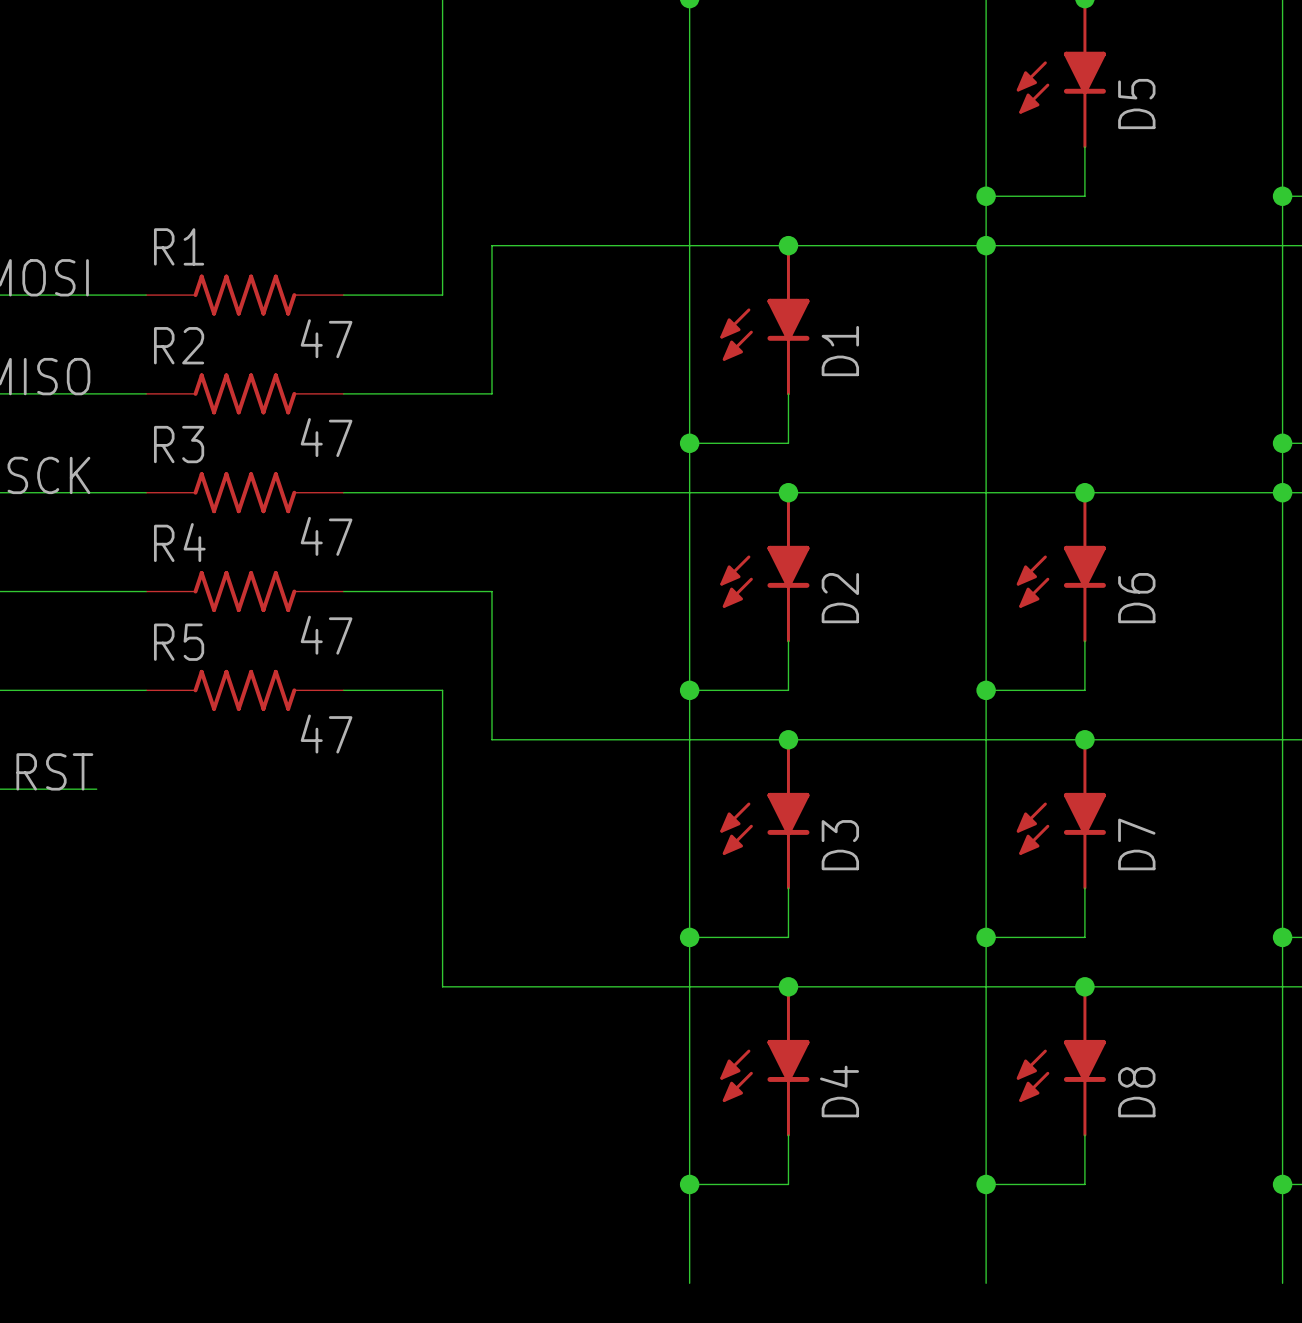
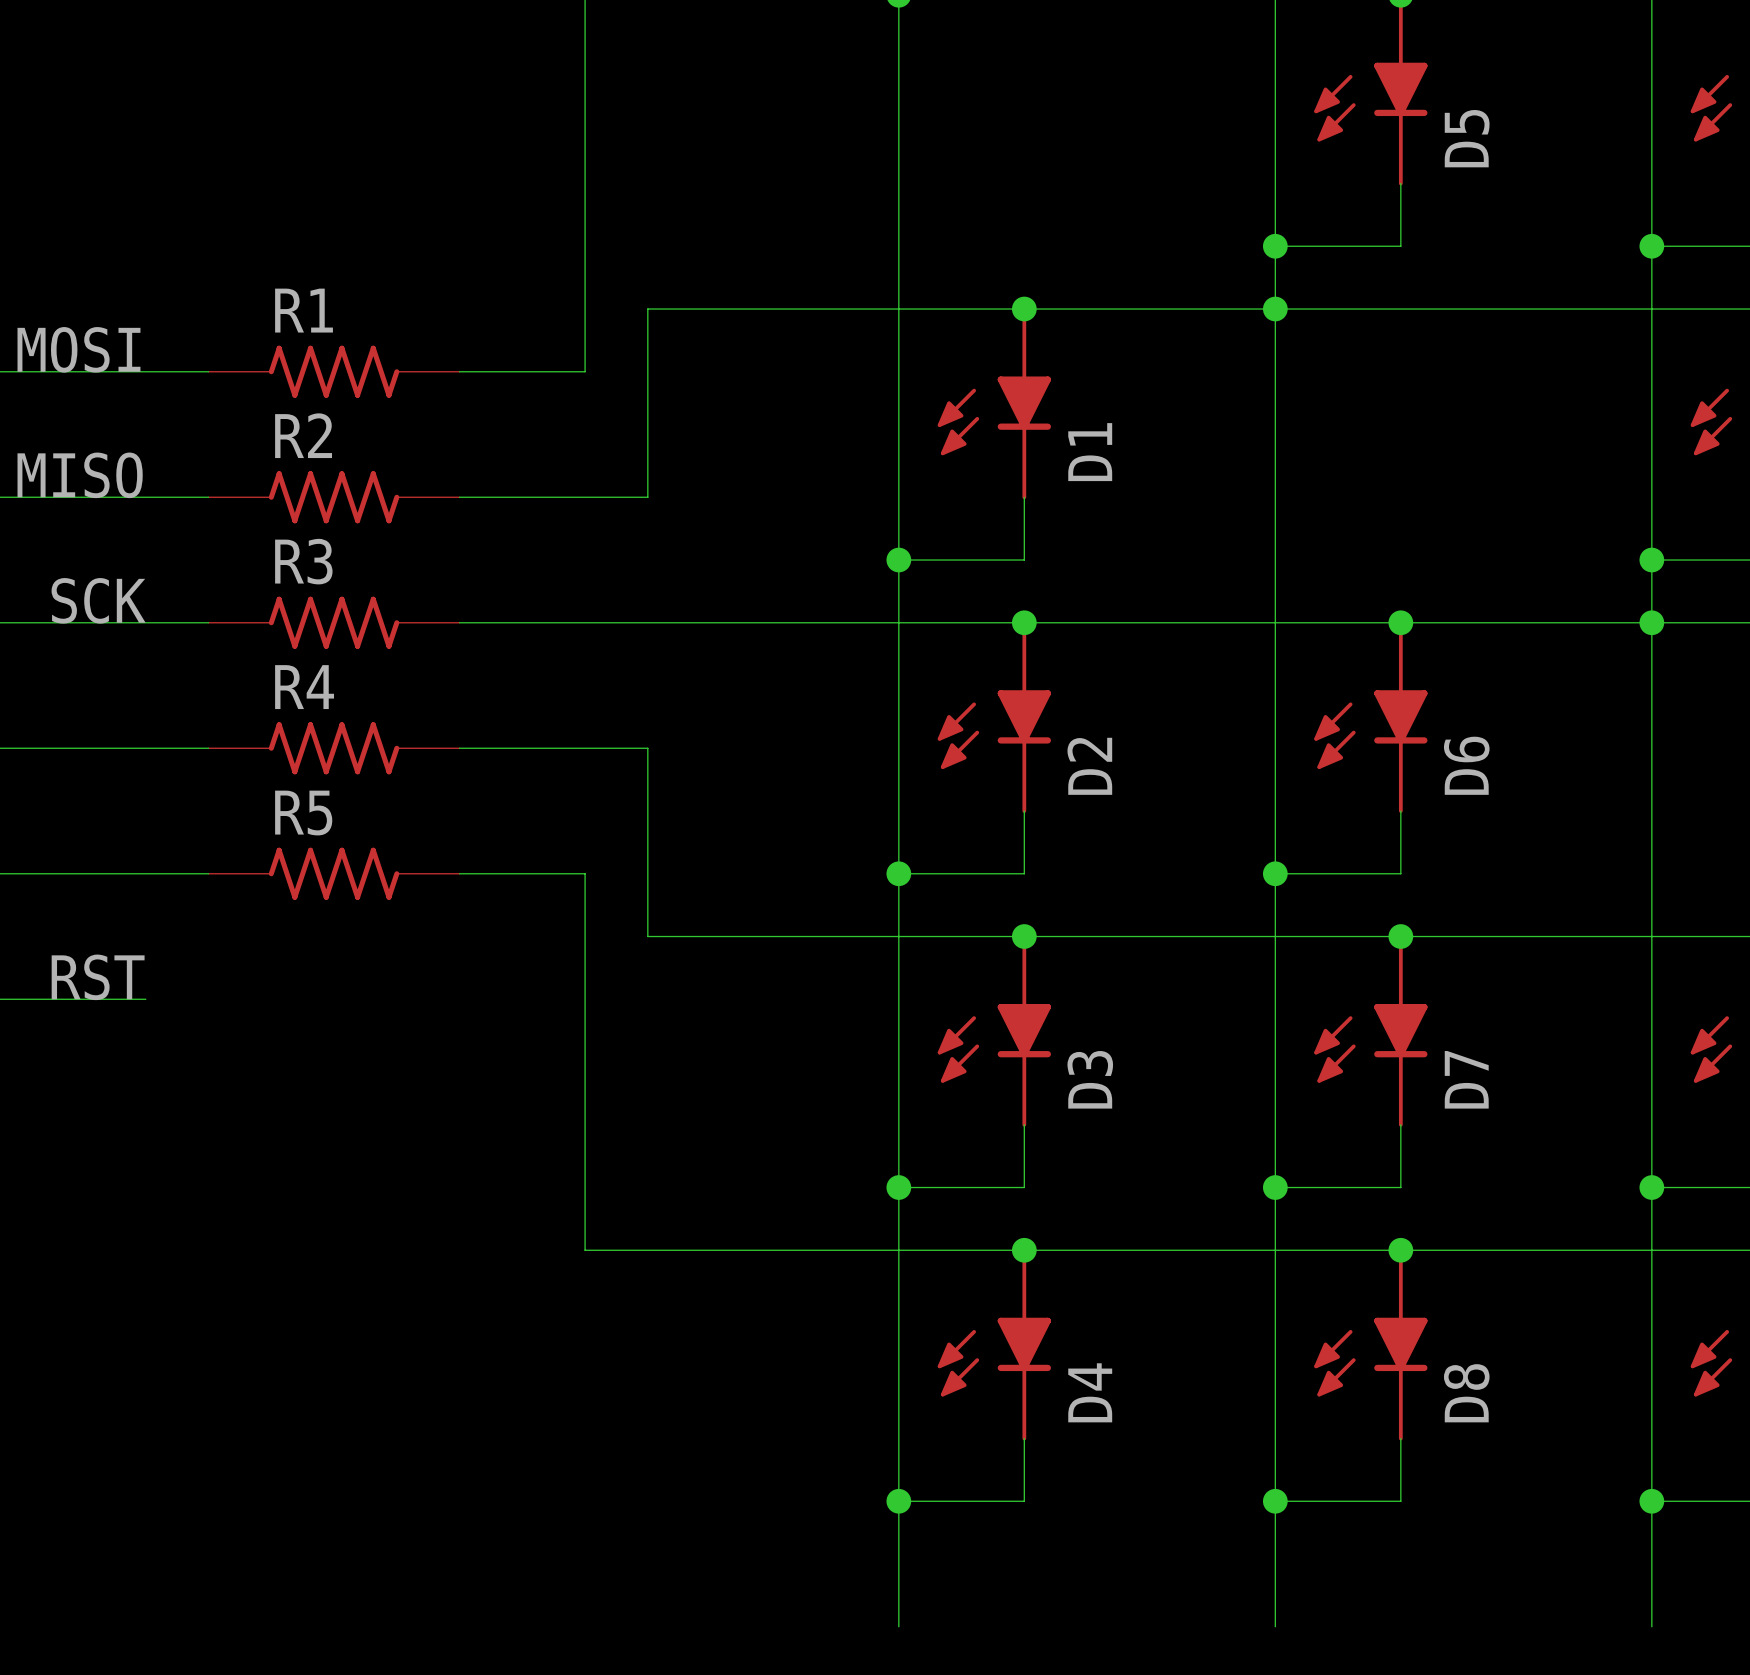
R1 name position: R1 (179, 246) -> R1 (304, 310)
R1 value: 47 (326, 338) -> none
R2 name position: R2 (179, 345) -> R2 (303, 435)
R2 value: 47 (326, 437) -> none
R3 name position: R3 (179, 444) -> R3 (303, 561)
R3 value: 47 (326, 536) -> none
R4 name position: R4 (179, 542) -> R4 (304, 687)
R4 value: 47 (326, 635) -> none
R5 name position: R5 (179, 642) -> R5 (303, 813)
R5 value: 47 (326, 734) -> none

